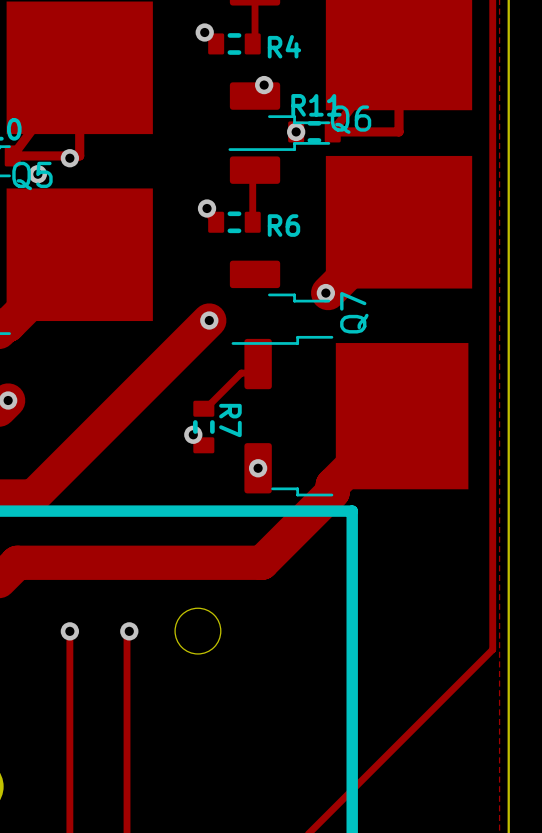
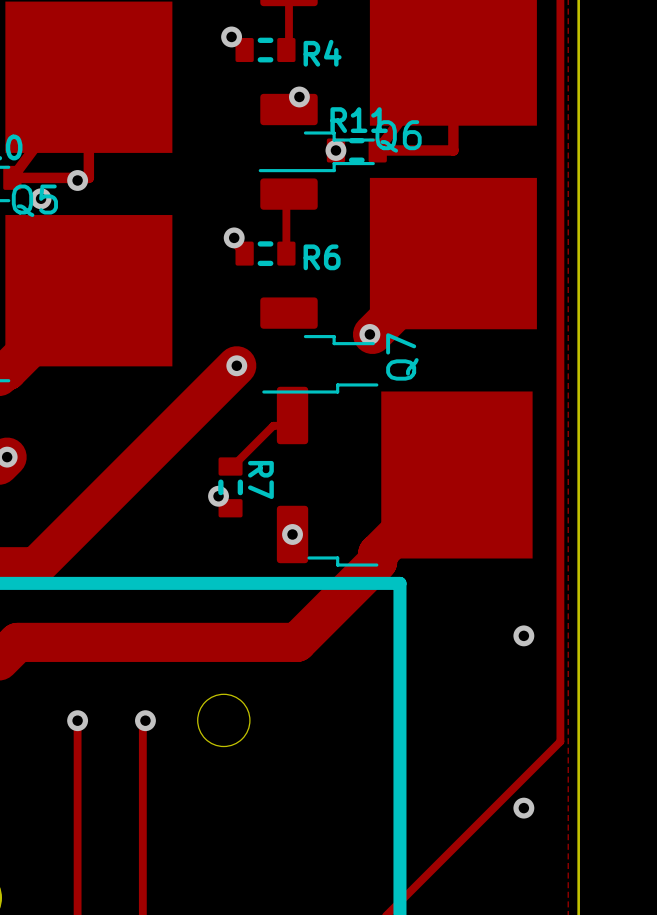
via: none -> (523, 635)
via: none -> (523, 808)

